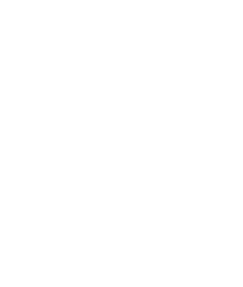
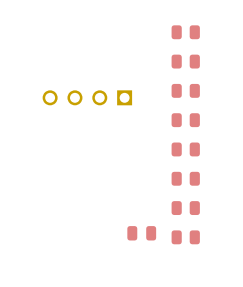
part: none -> (185, 32)
part: none -> (185, 61)
part: none -> (185, 90)
part: none -> (87, 97)
part: none -> (185, 120)
part: none -> (185, 149)
part: none -> (185, 178)
part: none -> (185, 208)
part: none -> (141, 233)
part: none -> (185, 237)

